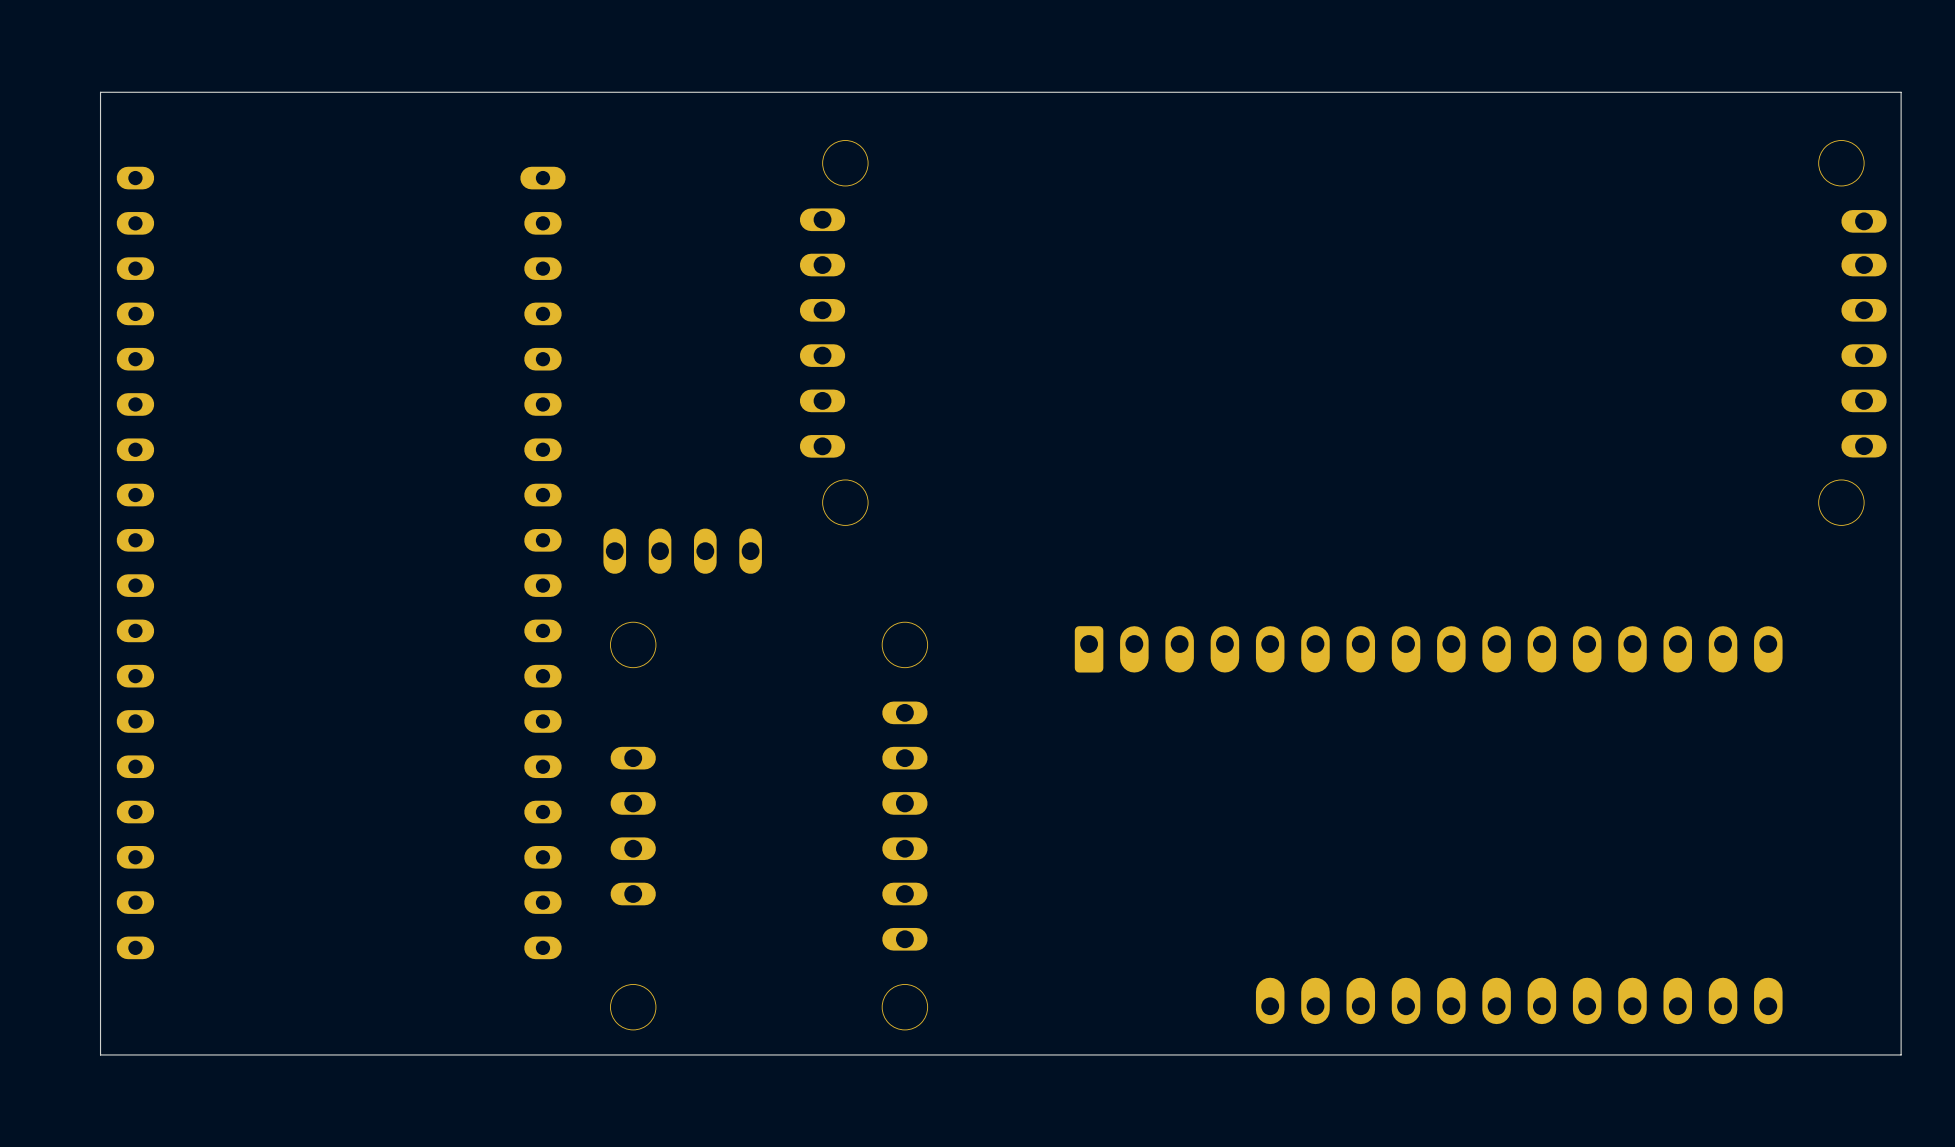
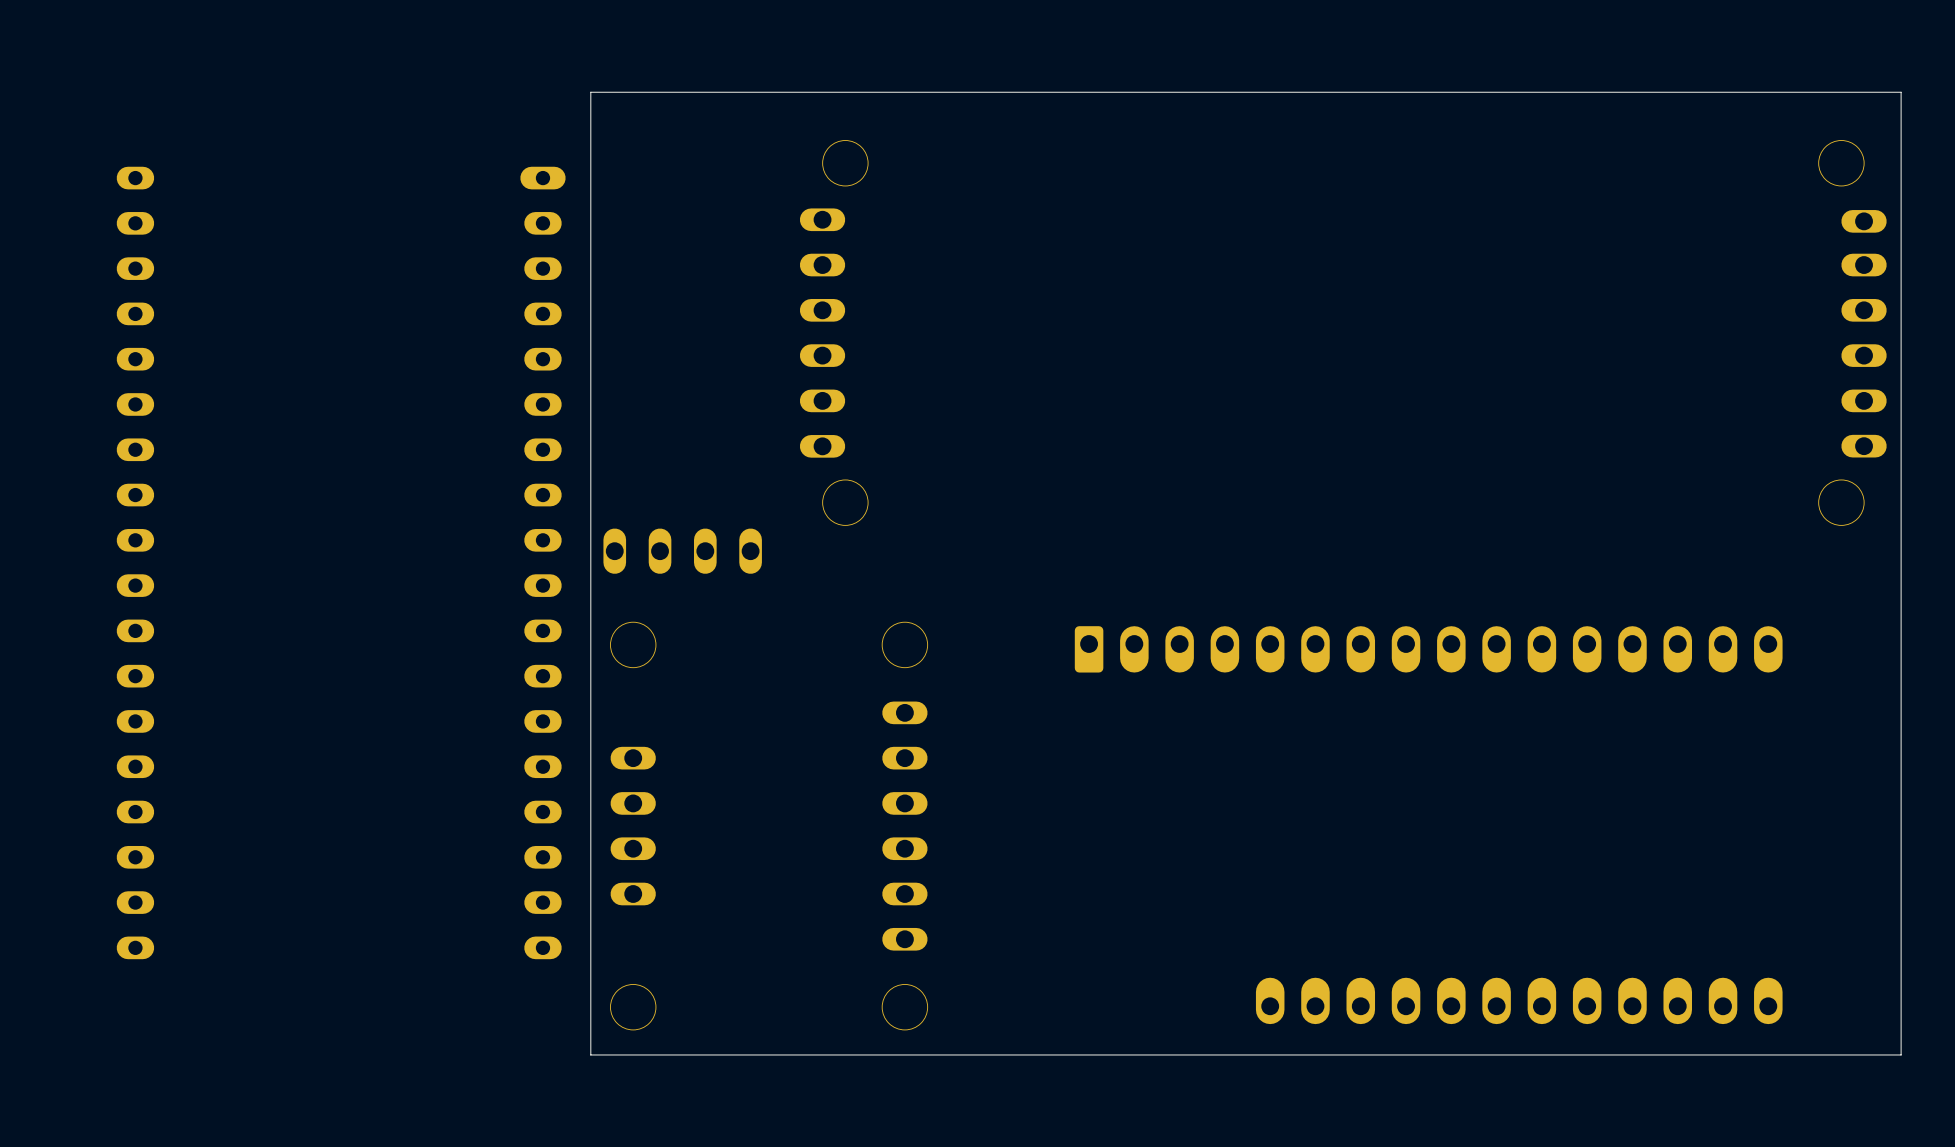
board edge: (590, 92) (100, 92) (100, 1054) (590, 1054) -> (590, 92) (590, 1054)

